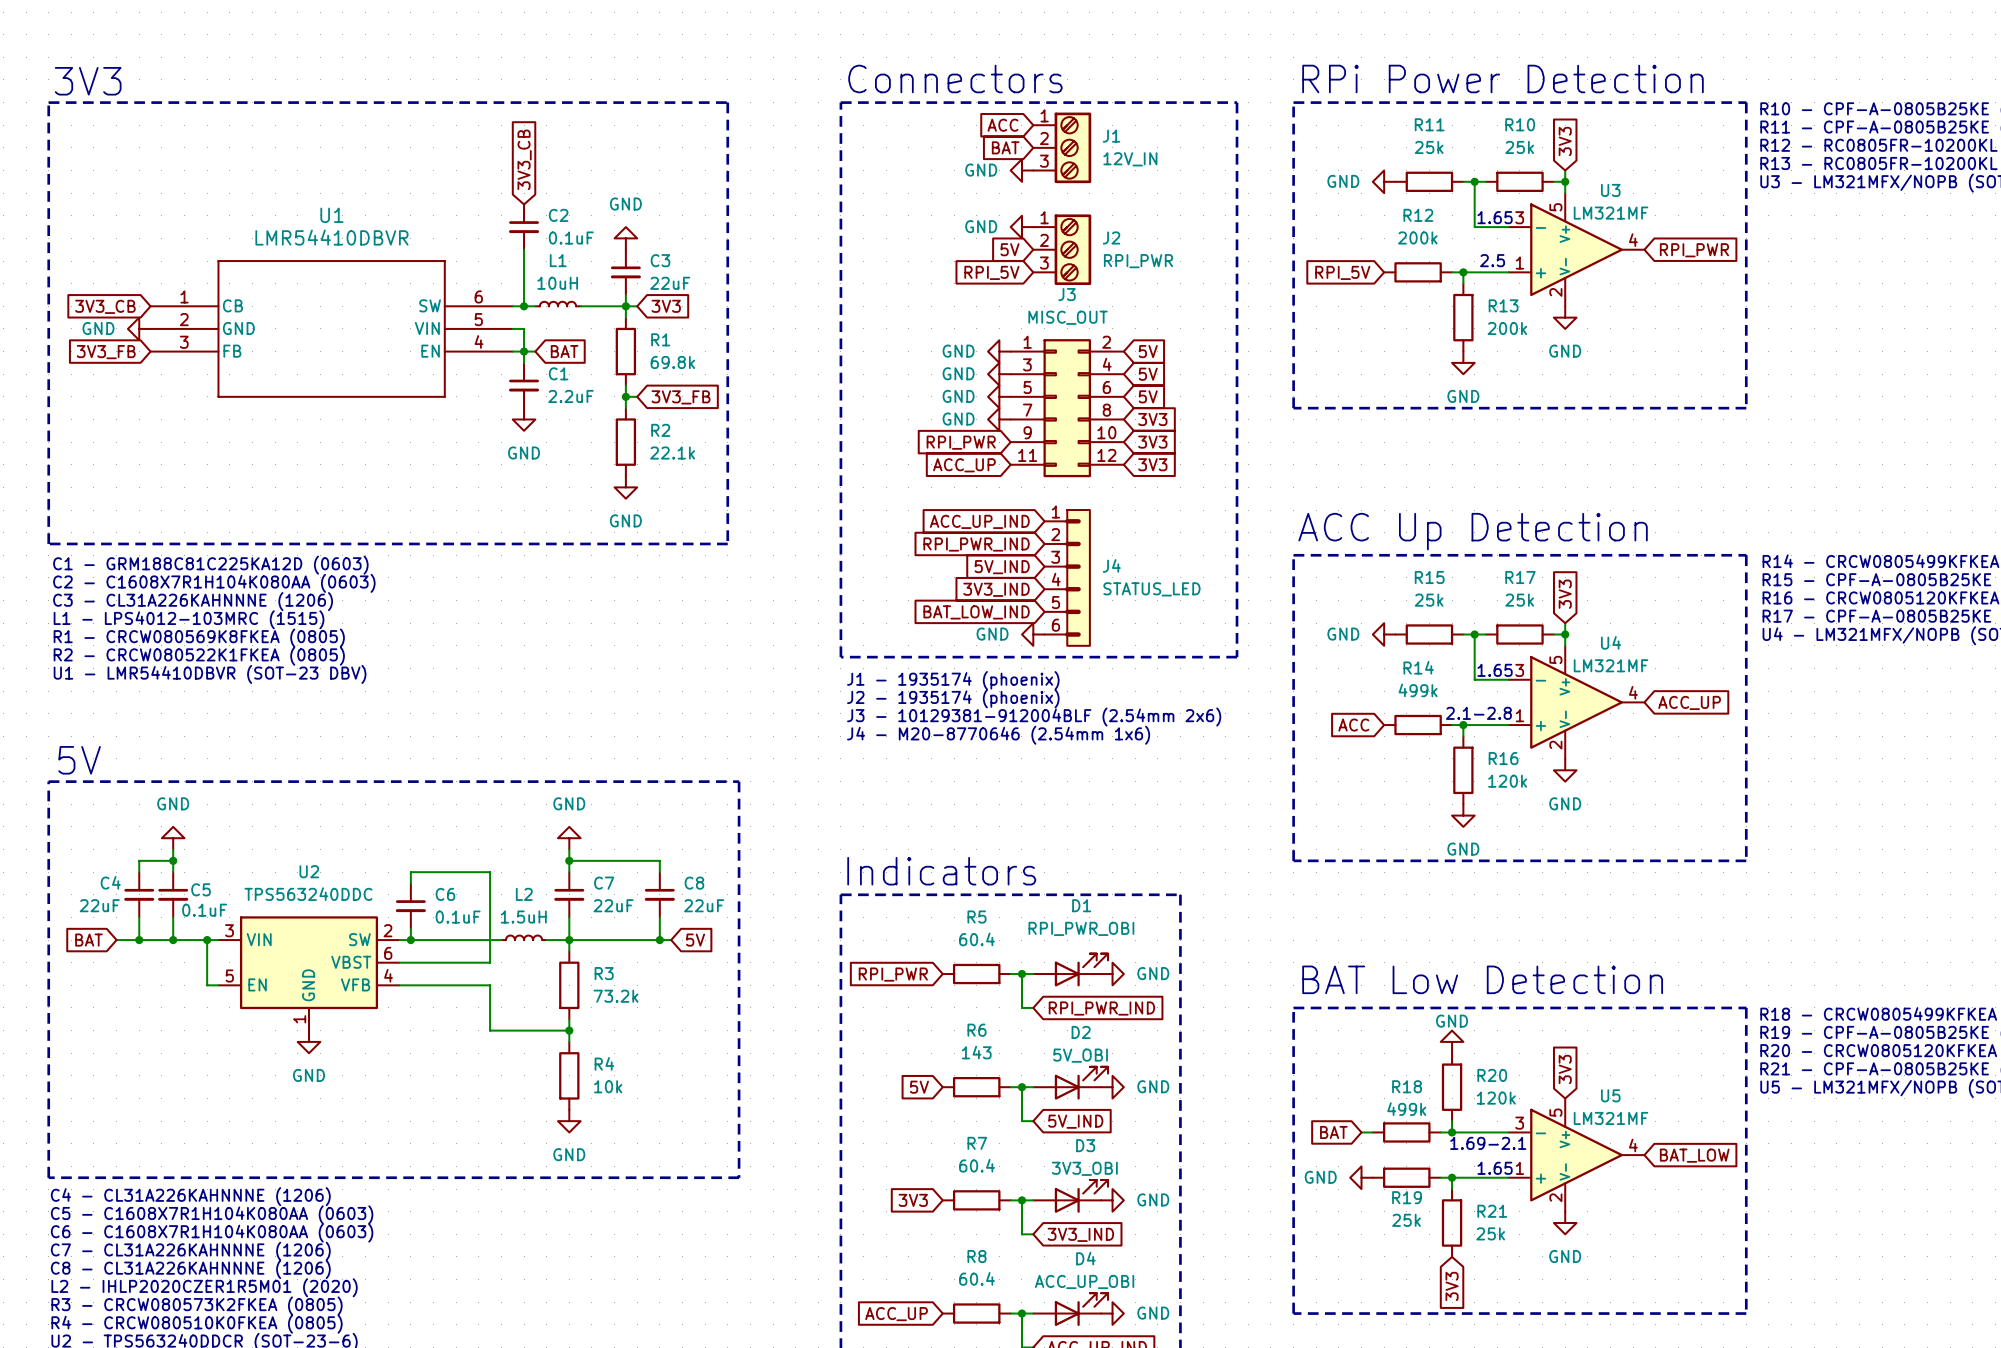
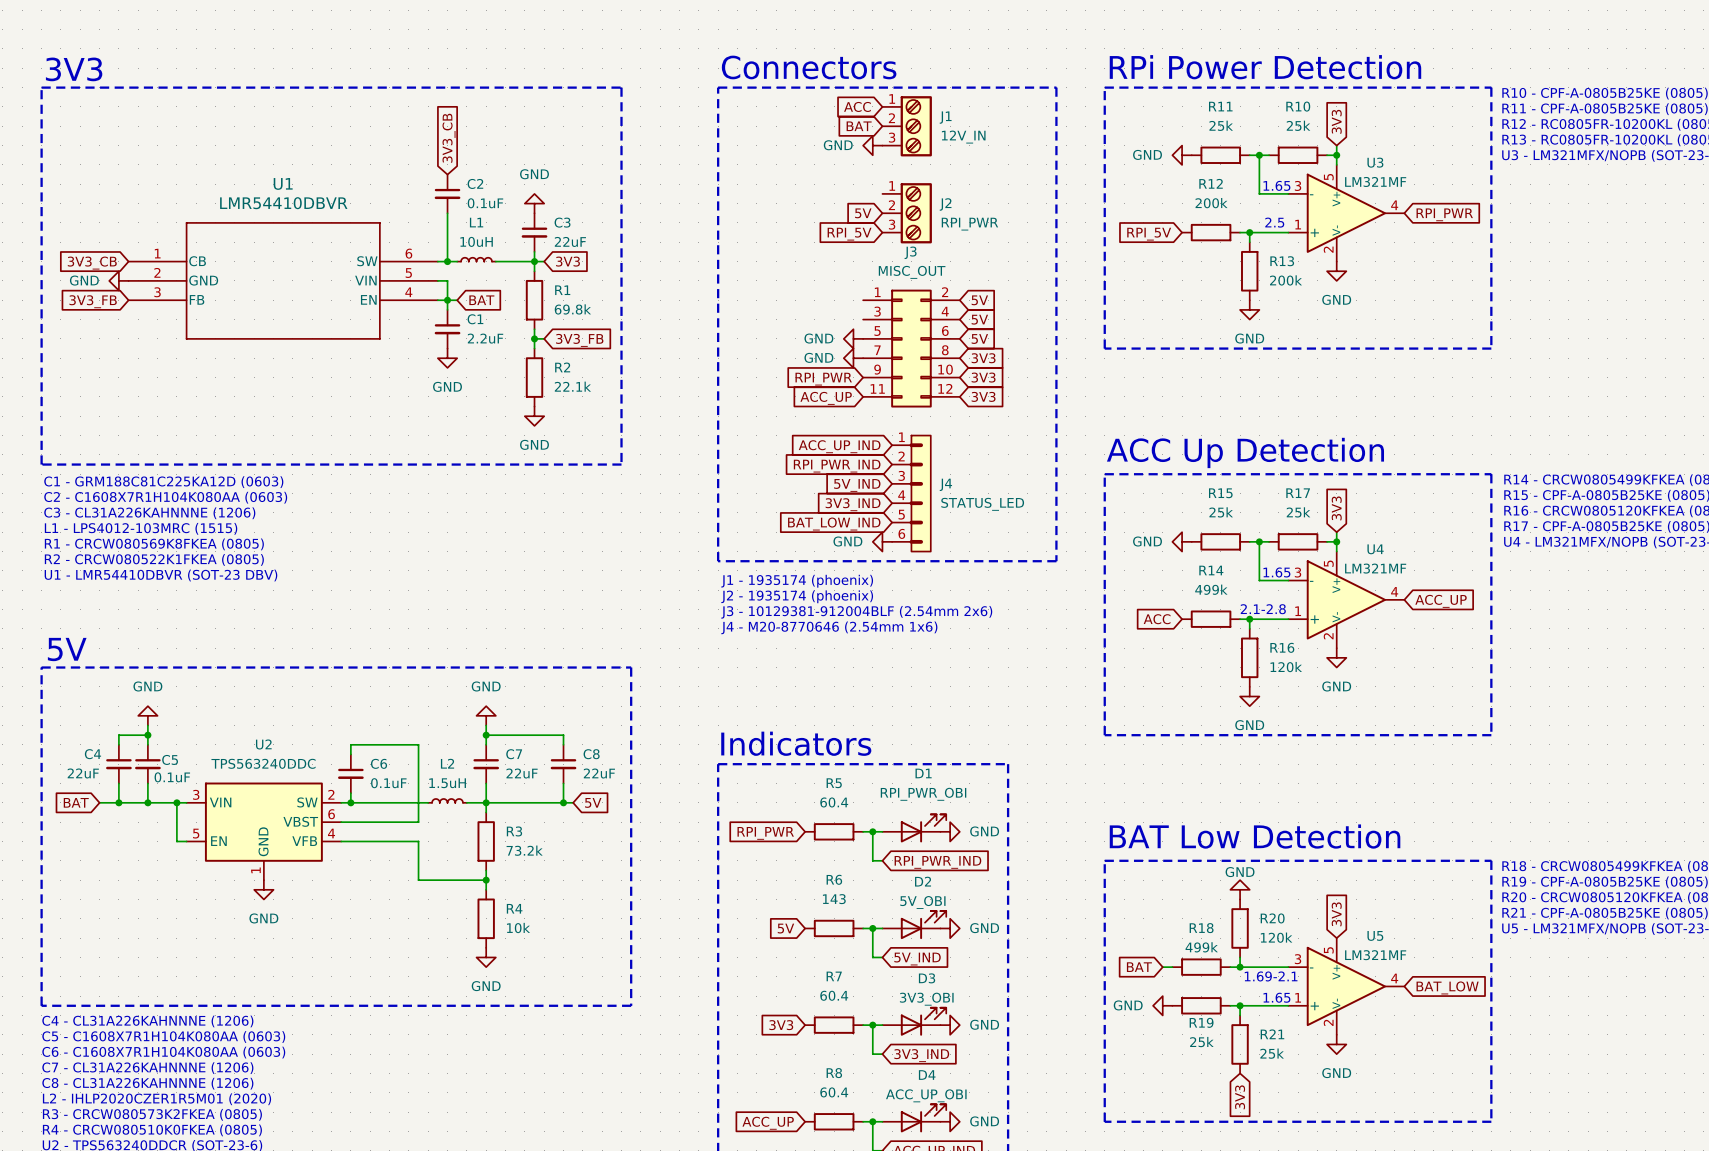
power symbol: GND (1021, 227) -> none
power symbol: GND (999, 351) -> none
power symbol: GND (999, 374) -> none

